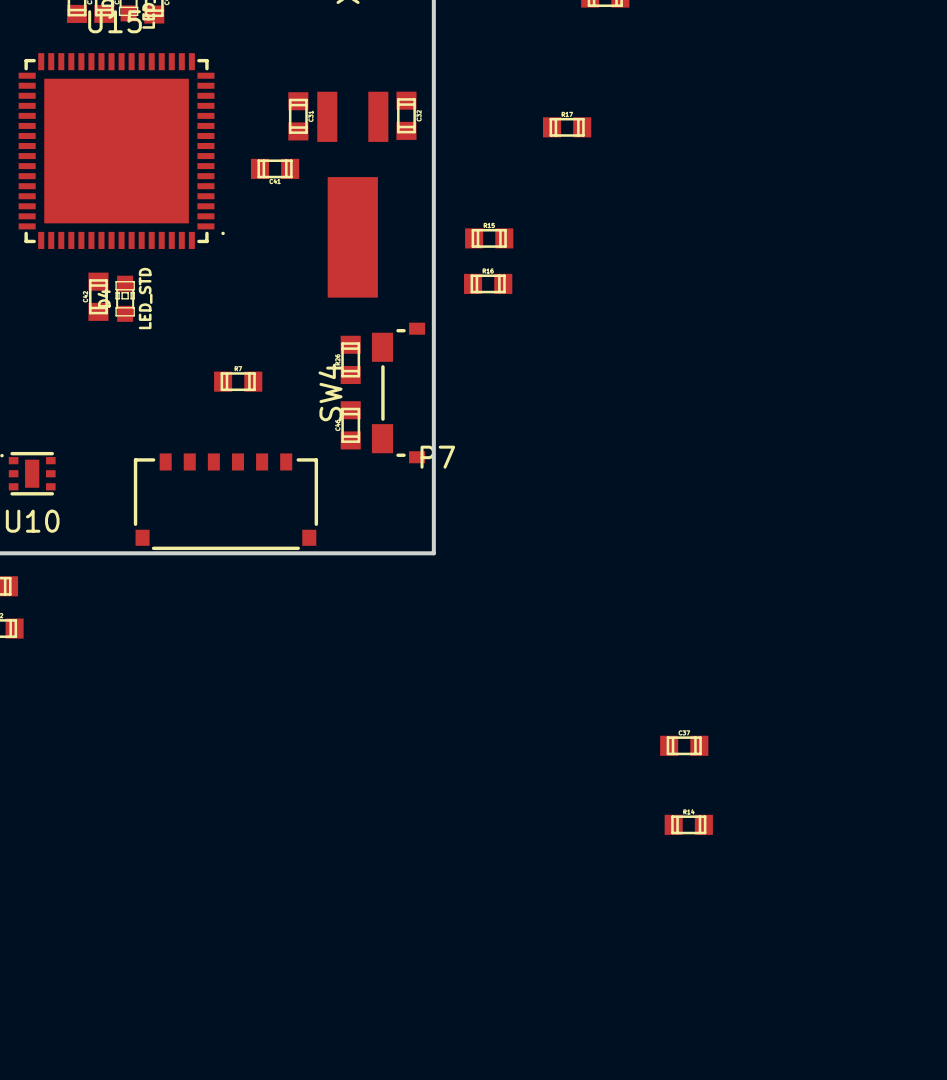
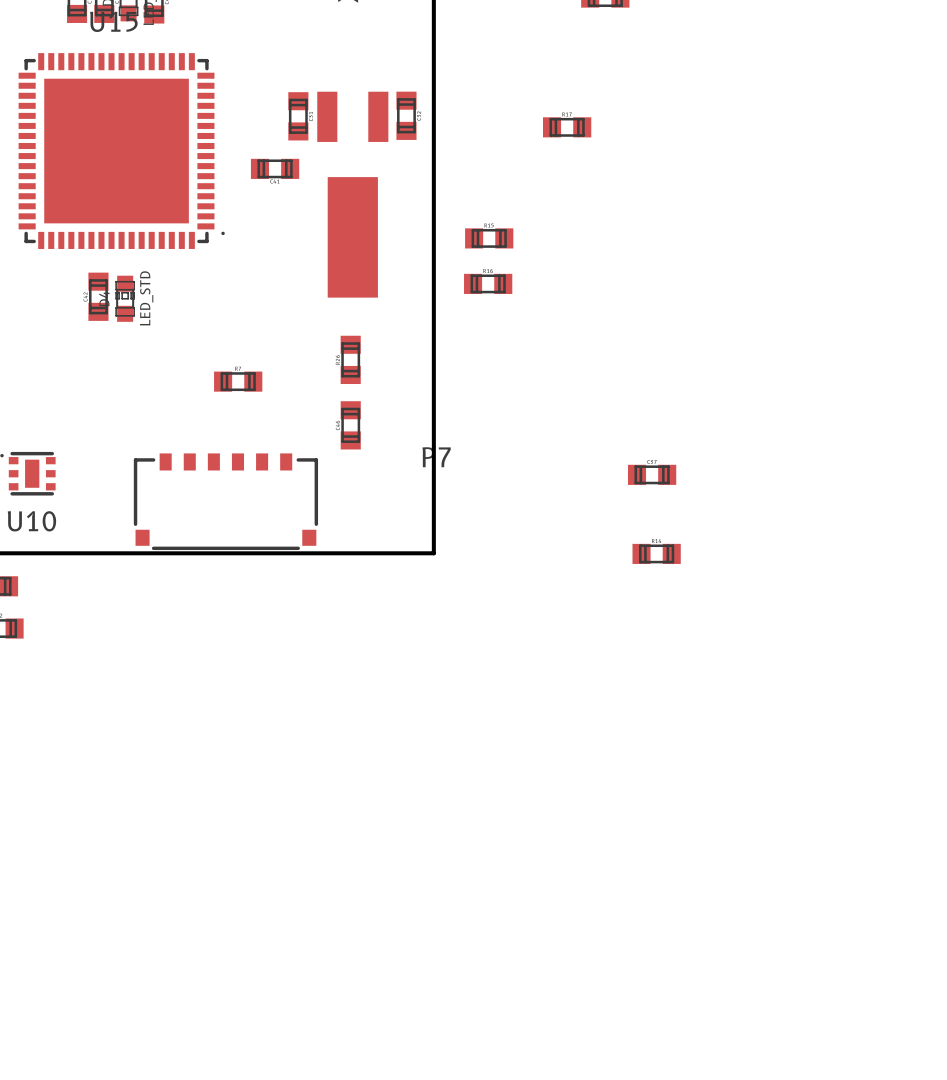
SW4: (398, 392) -> none
part position: (684, 745) -> (652, 474)
part position: (688, 824) -> (656, 553)

